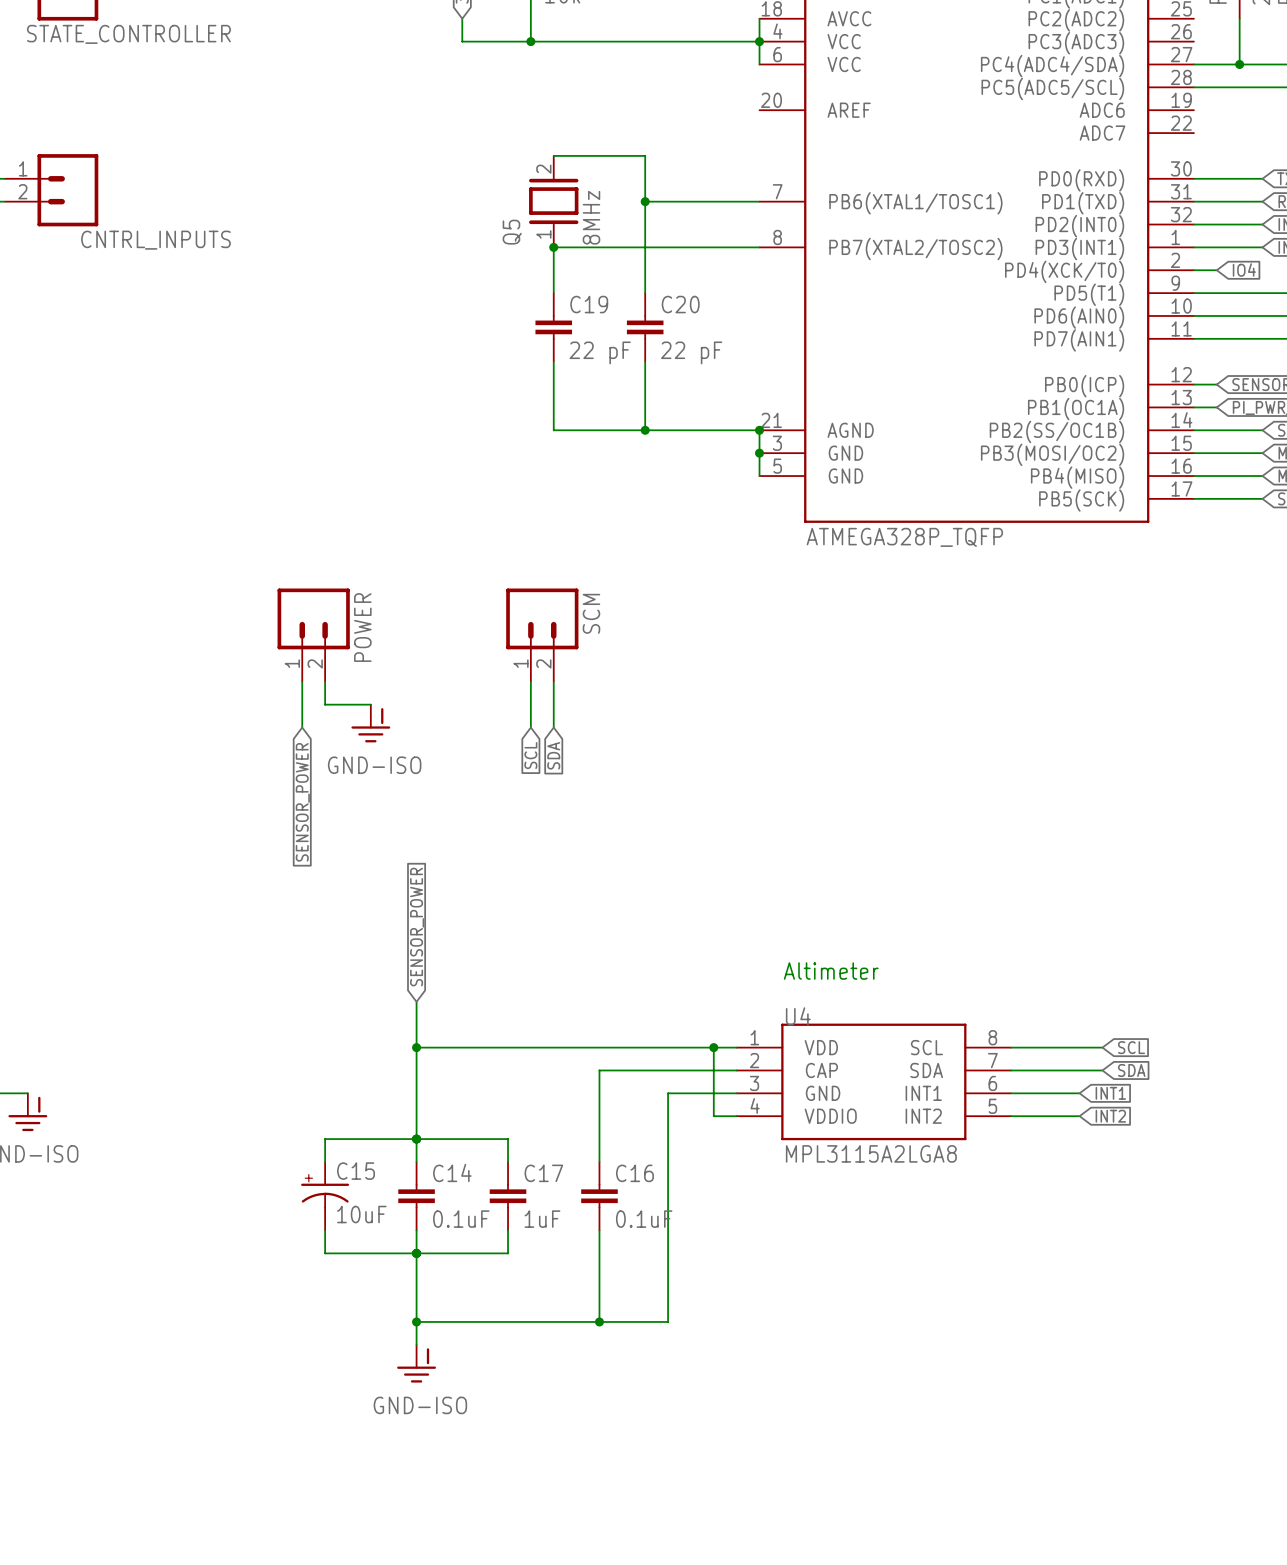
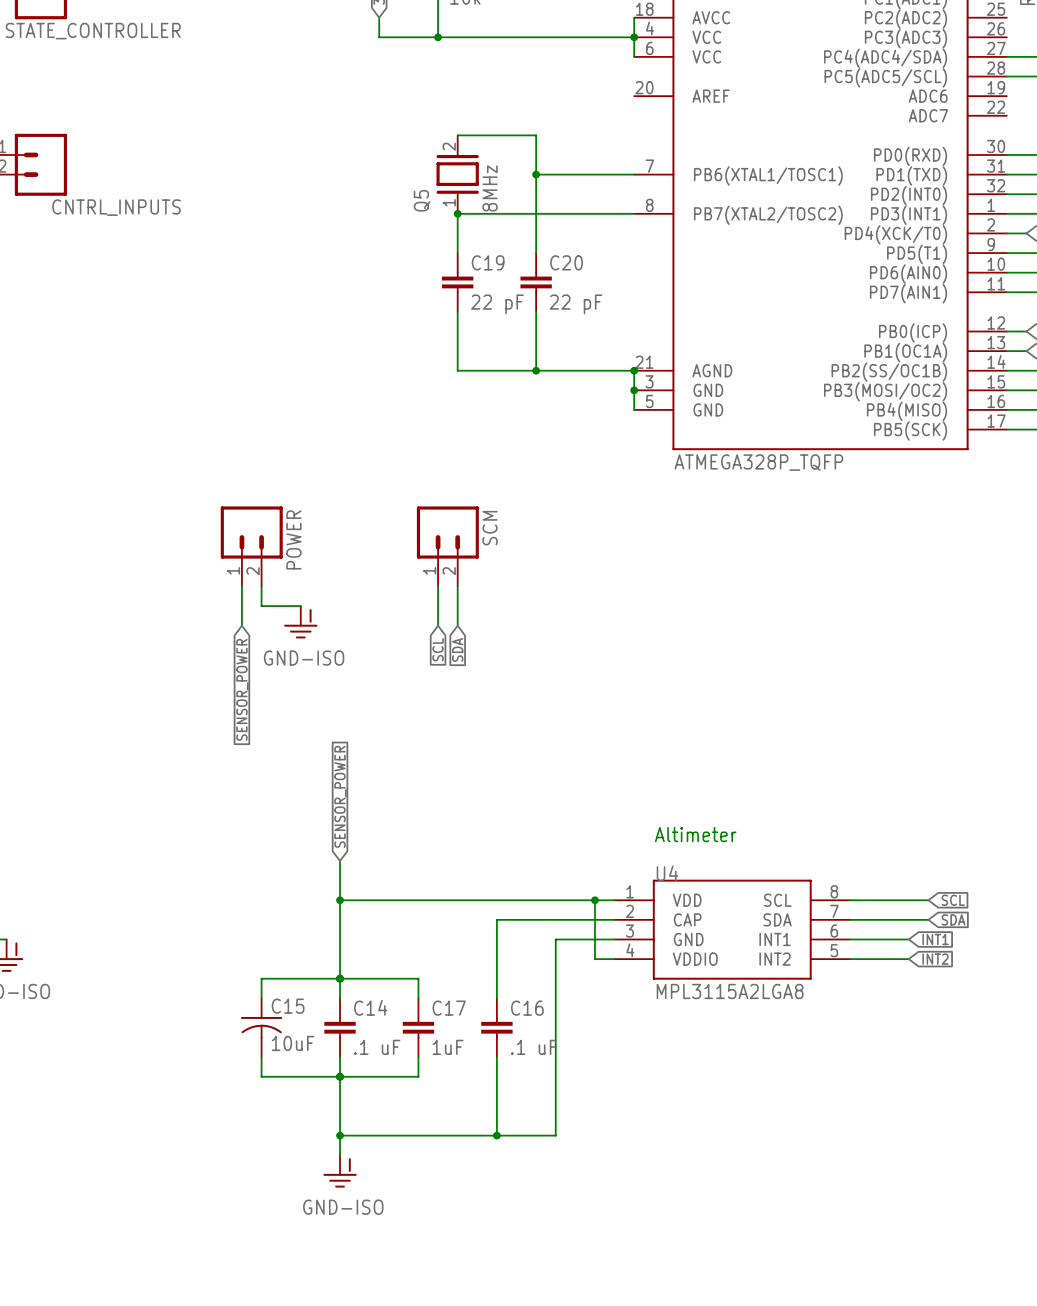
C15 symbol: [301, 1161, 350, 1231] -> [240, 998, 283, 1058]
C14 value: 0.1uF (461, 1219) -> .1 uF (377, 1047)
C16 value: 0.1uF (644, 1219) -> .1 uF (534, 1047)

